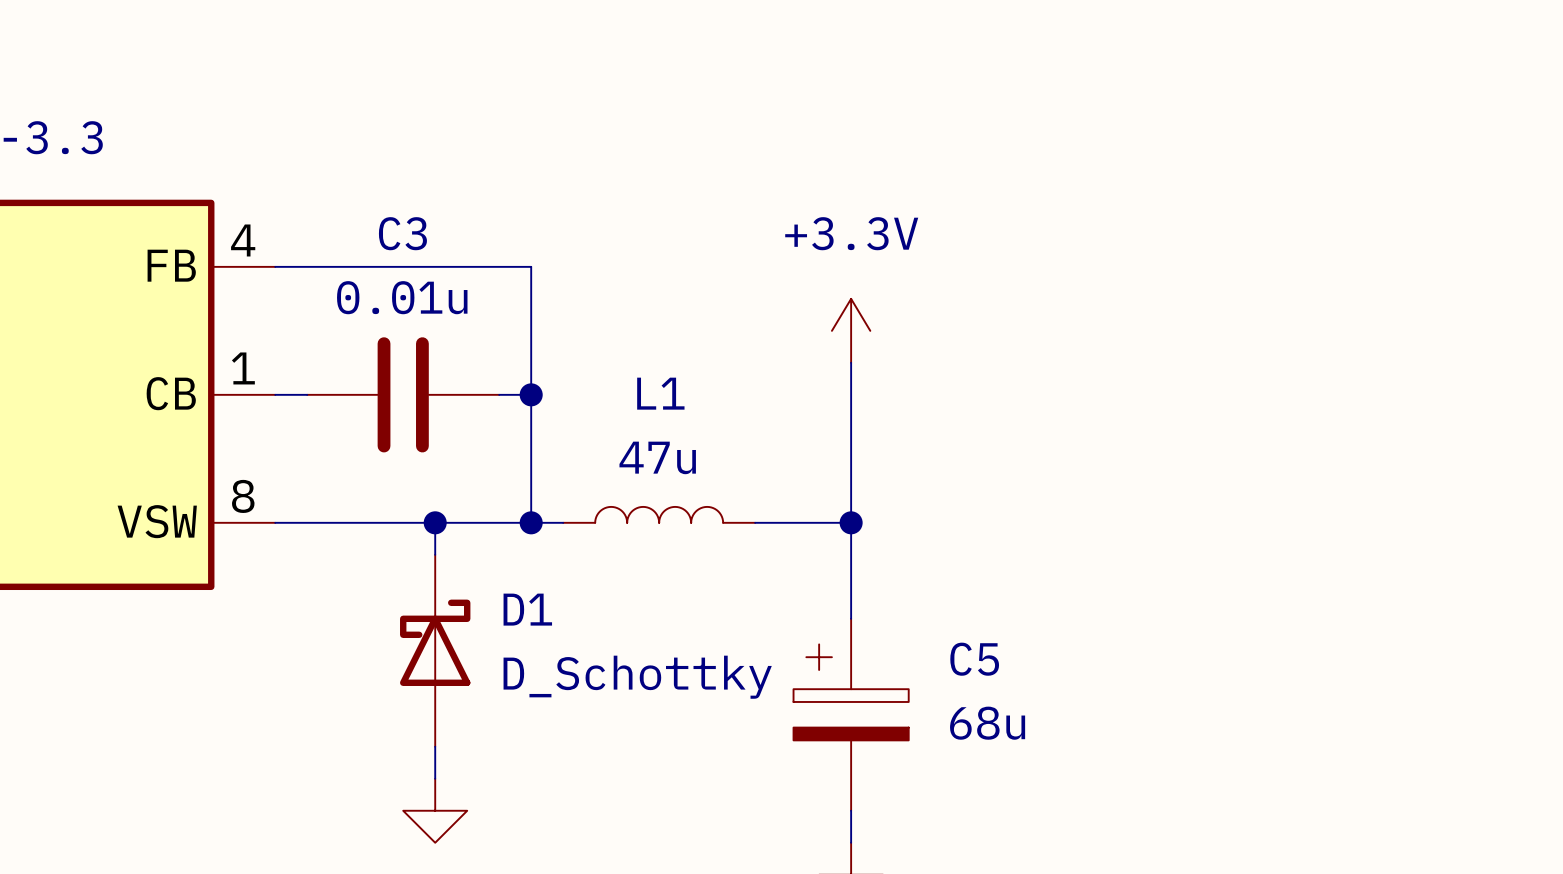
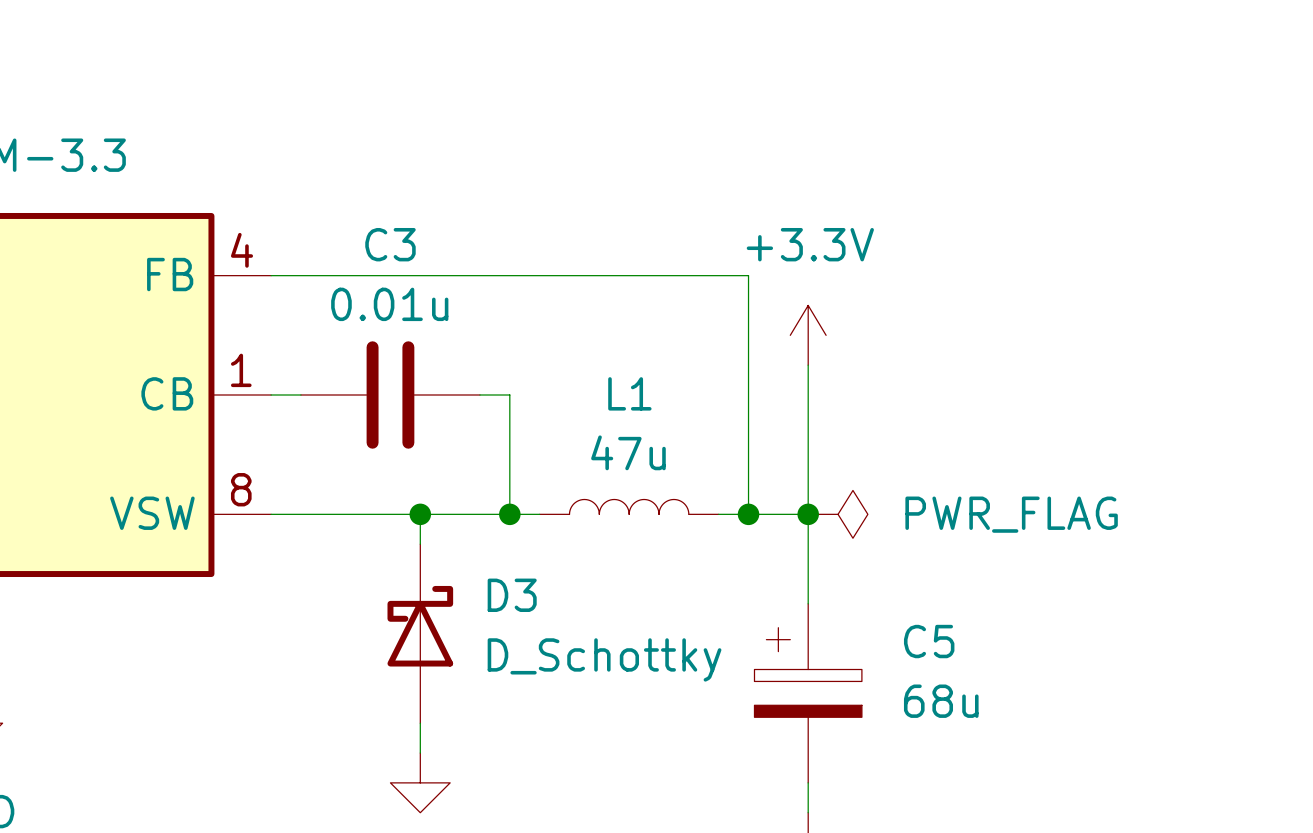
wire: (531, 266) (531, 394) -> (509, 275) (748, 275) (748, 514)
junction: (531, 394) -> none
junction: none -> (748, 514)
power symbol: none -> PWR_FLAG (838, 514)
D1 name: D1 (527, 609) -> D3 (512, 595)

